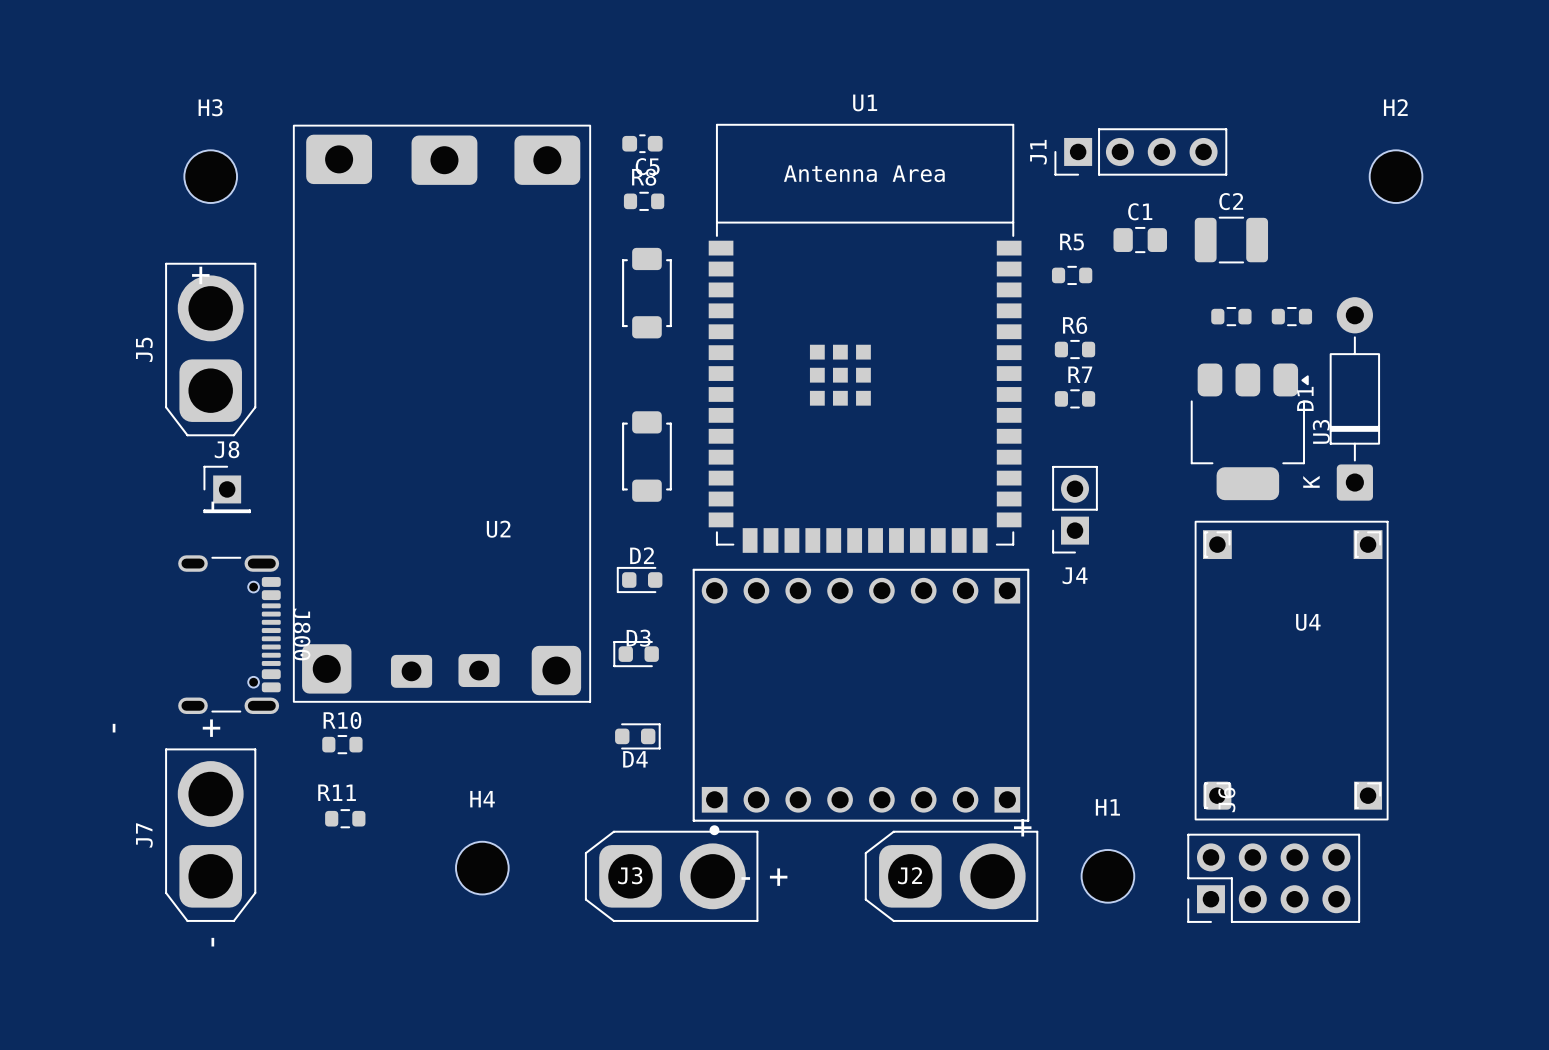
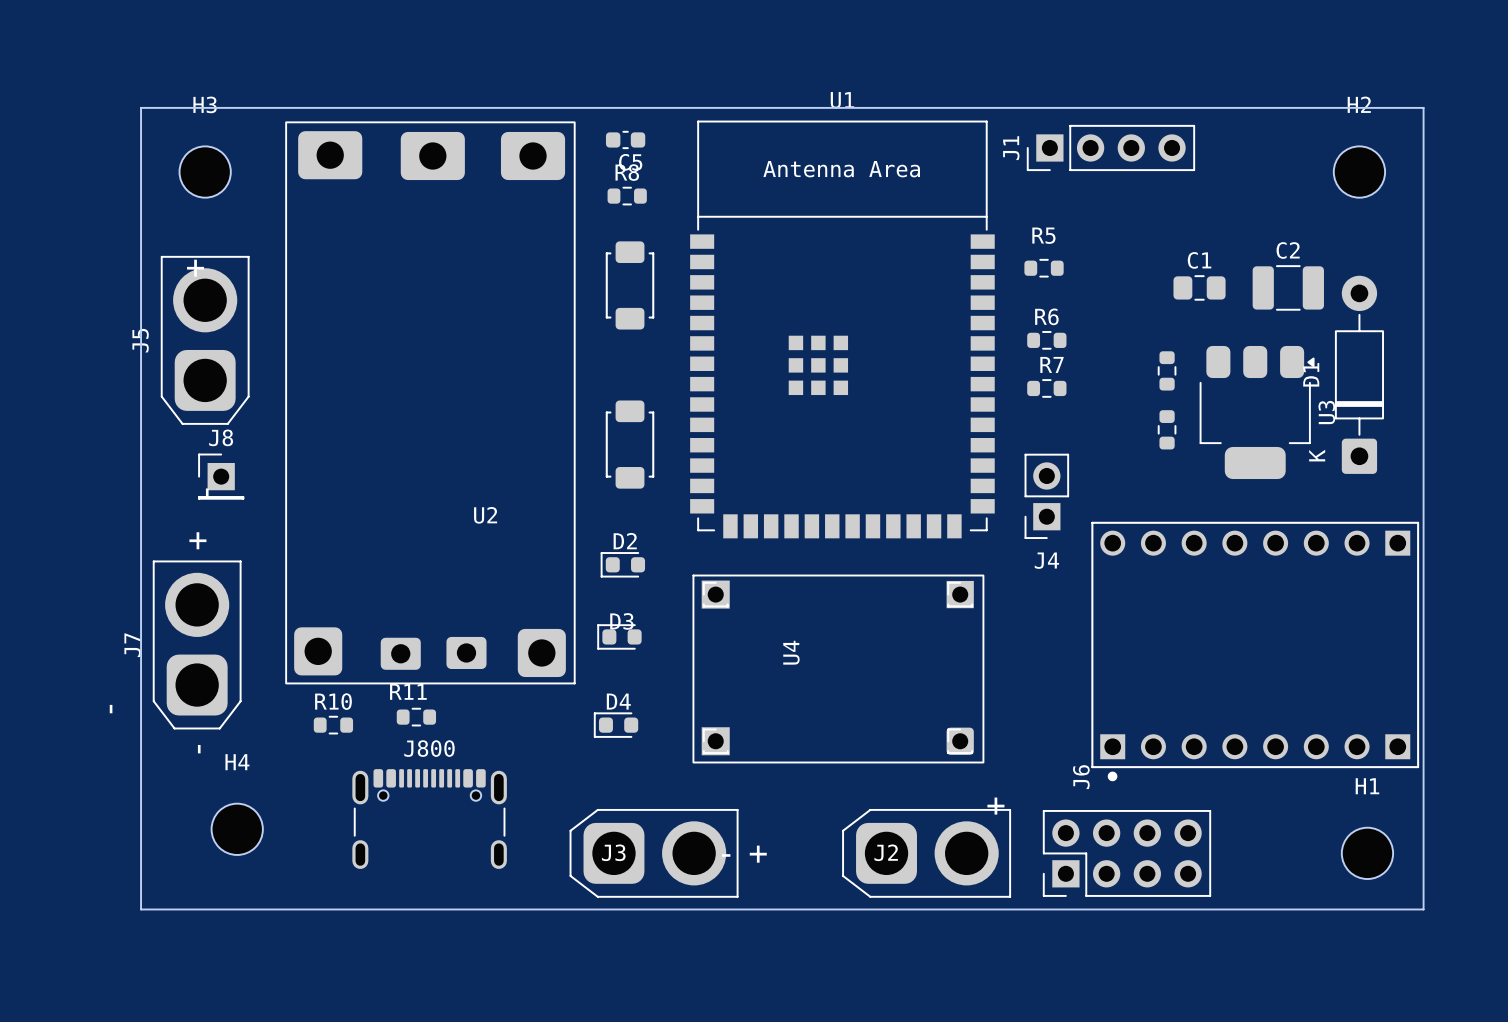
board edge: none -> (141, 107) (1423, 107) (1423, 909) (141, 909) (141, 107)
C1 position: (1140, 240) -> (1199, 287)
C2 position: (1231, 240) -> (1288, 287)
part: (1231, 316) -> none
part: (1291, 316) -> none
part: none -> (1167, 370)
D1 position: (1354, 398) -> (1359, 374)
U3 position: (1249, 431) -> (1257, 412)
part: none -> (1167, 429)
J800 rotation: 0° (229, 634) -> 90° counterclockwise (429, 819)
J800 position: (229, 634) -> (429, 819)
part: none -> (1255, 651)
U4 rotation: 0° (1291, 670) -> 90° counterclockwise (838, 669)
U4 position: (1291, 670) -> (838, 669)
part: (860, 701) -> none
D4 rotation: 0° (637, 736) -> 180° (616, 725)
R11 position: (345, 818) -> (416, 717)
J7 position: (210, 835) -> (197, 644)
H4 position: (482, 868) -> (237, 829)
H1 position: (1107, 876) -> (1367, 853)
J6 position: (1273, 878) -> (1126, 853)

